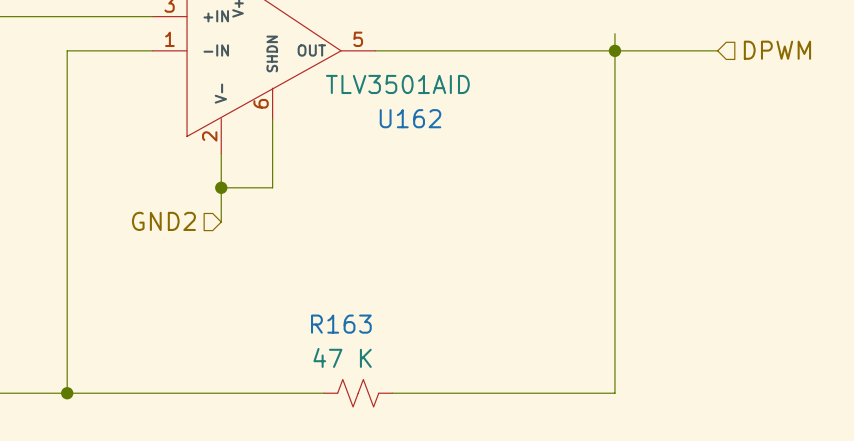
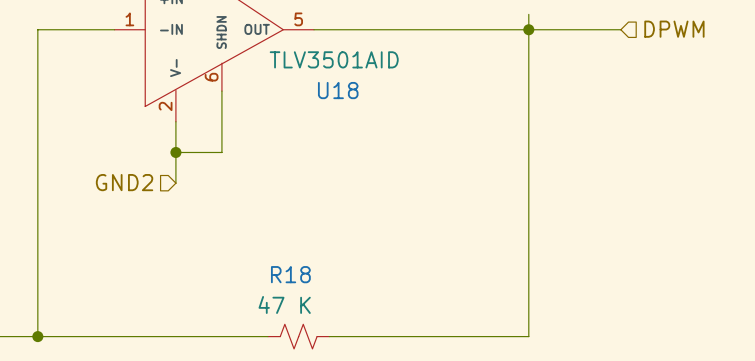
U162 name: U162 (410, 118) -> U18 (338, 90)
R163 name: R163 (341, 324) -> R18 (290, 274)

